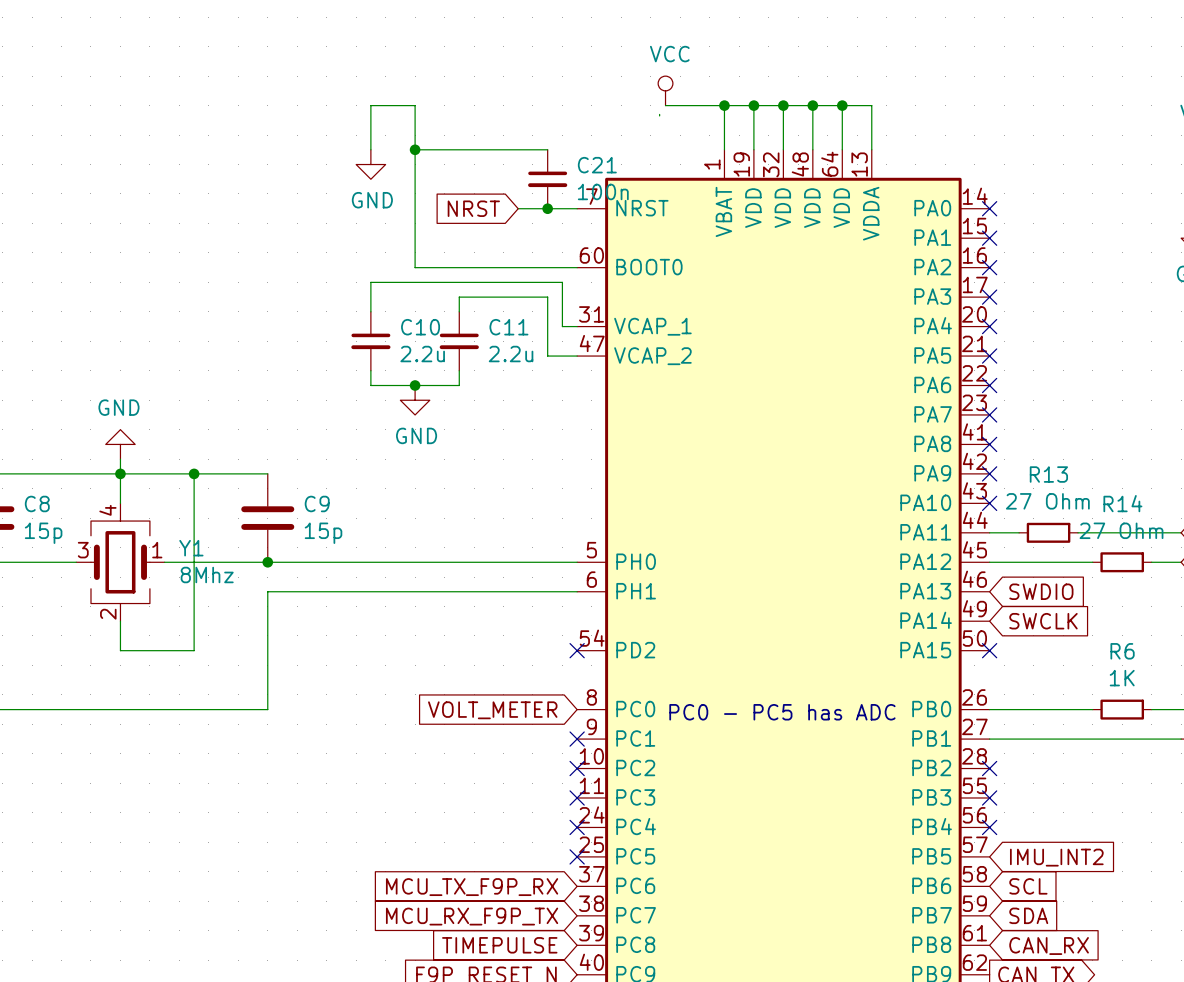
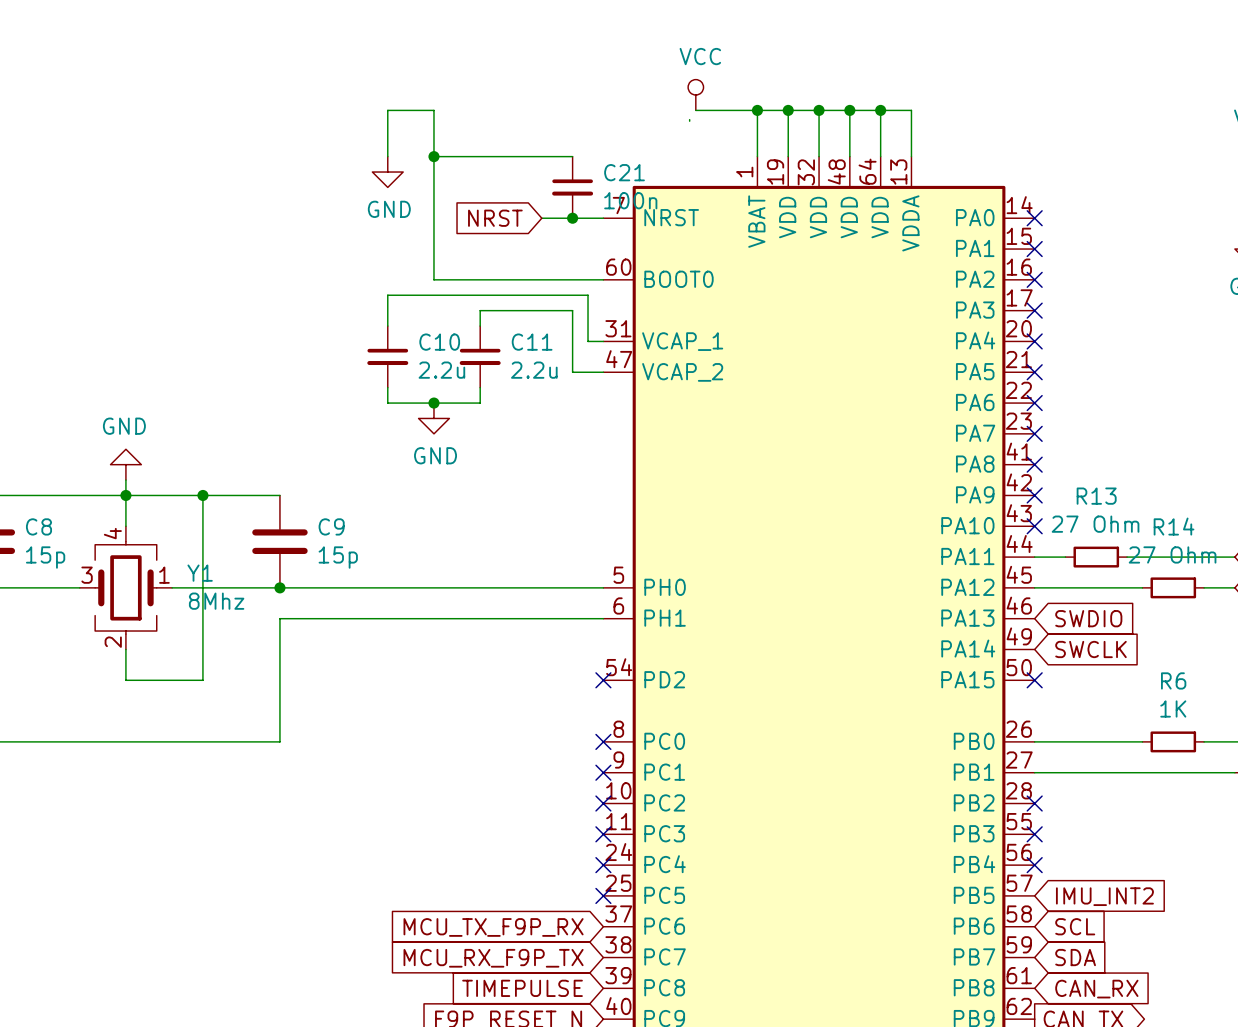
no-connect mark: none -> (603, 741)
global label: VOLT_METER (492, 710) -> none
text: PC0 - PC5 has ADC (782, 712) -> none

